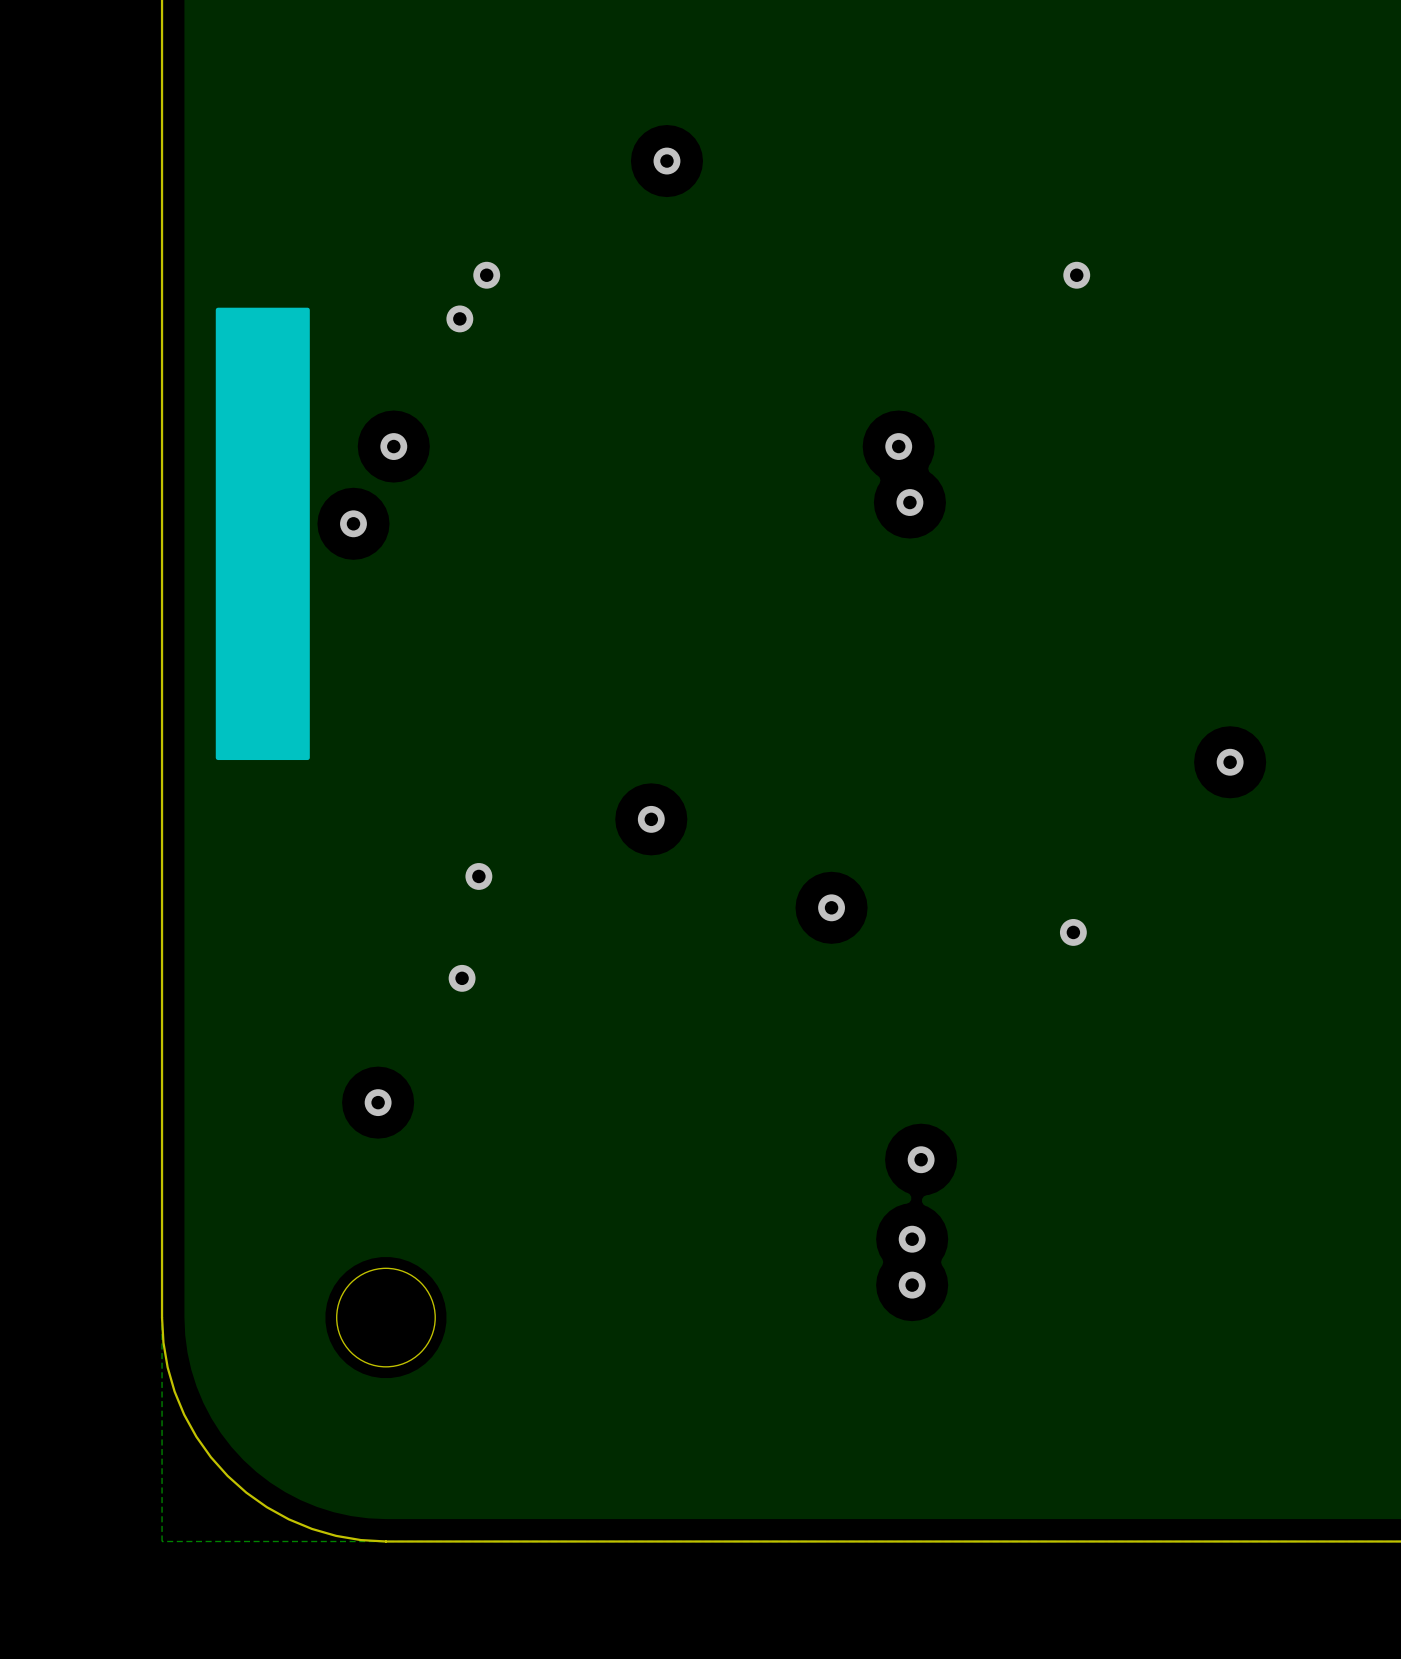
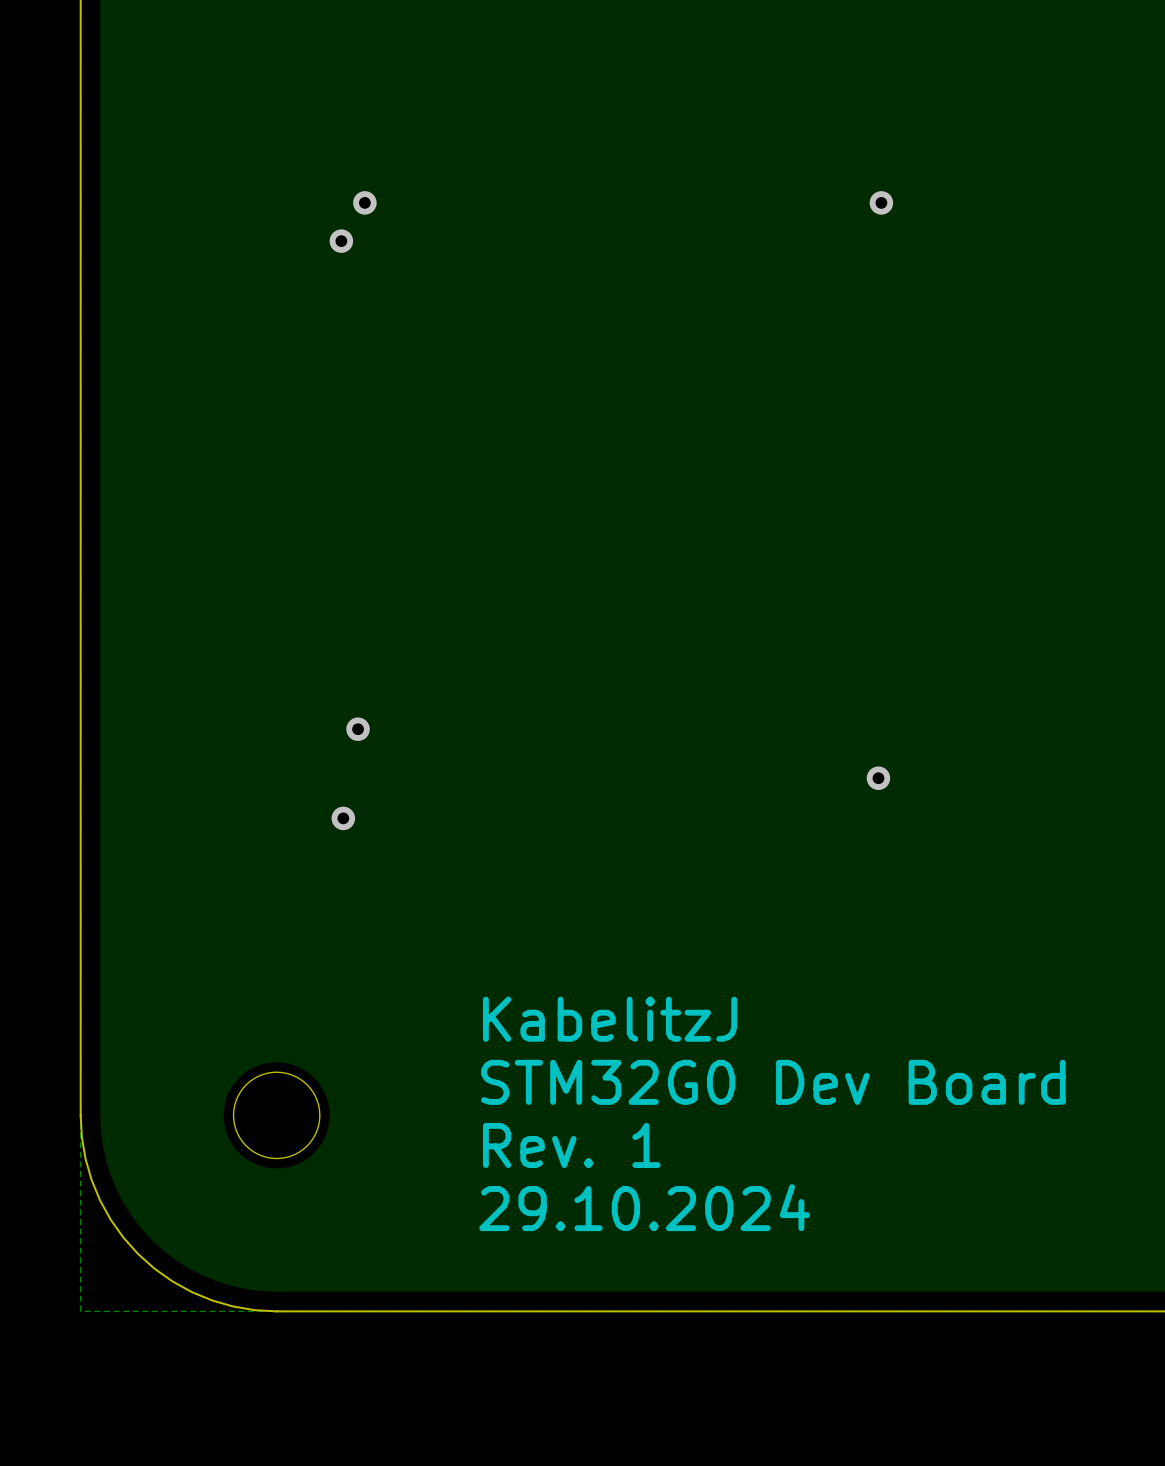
via: (666, 161) -> none
drawing: [215, 307, 310, 761] -> none
via: (393, 446) -> none
via: (898, 446) -> none
via: (909, 502) -> none
via: (353, 523) -> none
via: (1230, 762) -> none
via: (651, 819) -> none
via: (831, 907) -> none
via: (378, 1102) -> none
via: (921, 1159) -> none
text: none -> KabelitzJ (610, 1019)
via: (912, 1239) -> none
text: none -> STM32G0 Dev Board (773, 1082)
via: (912, 1285) -> none
text: none -> Rev. 1 (571, 1145)
text: none -> 29.10.2024 (644, 1207)

